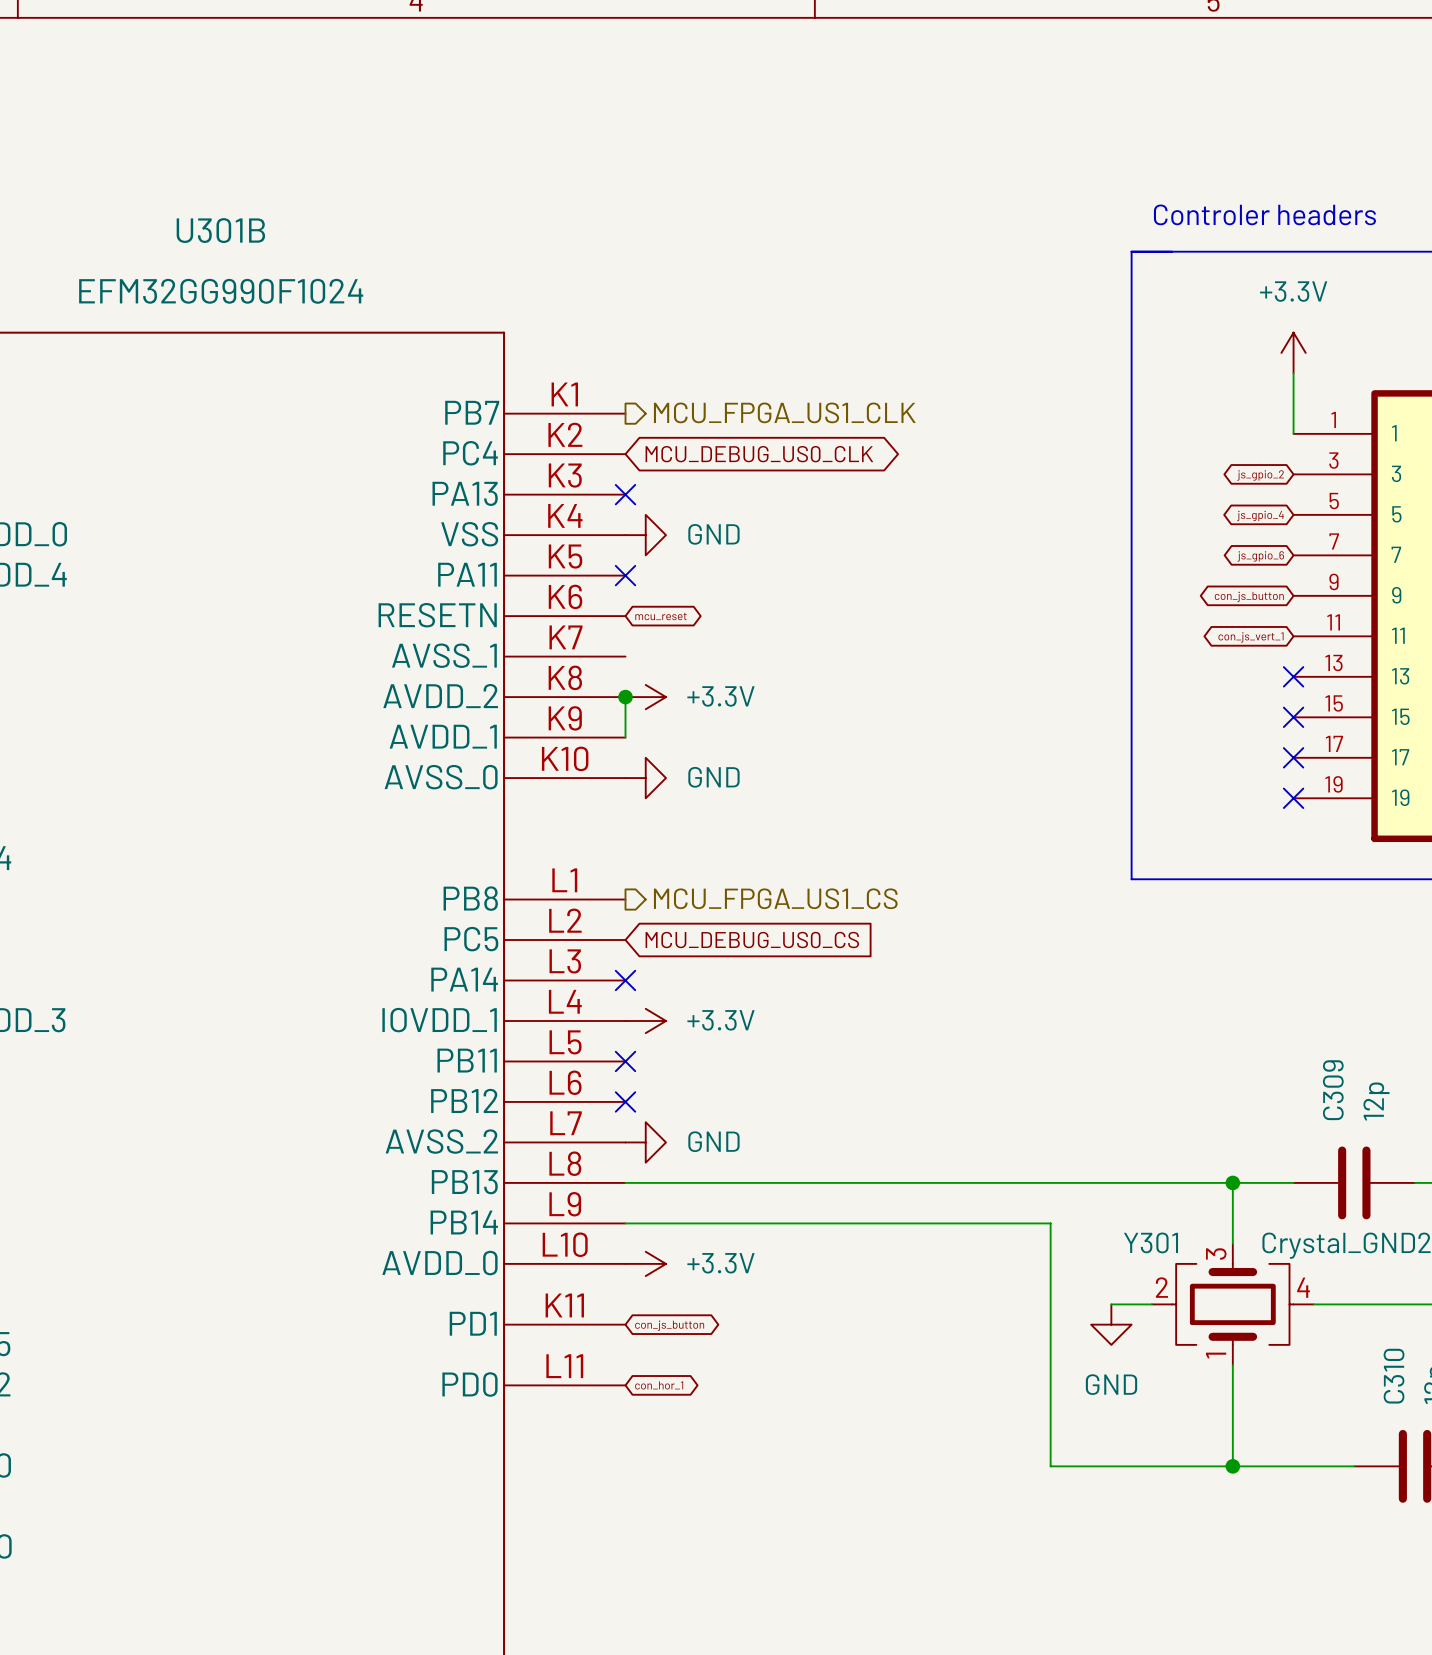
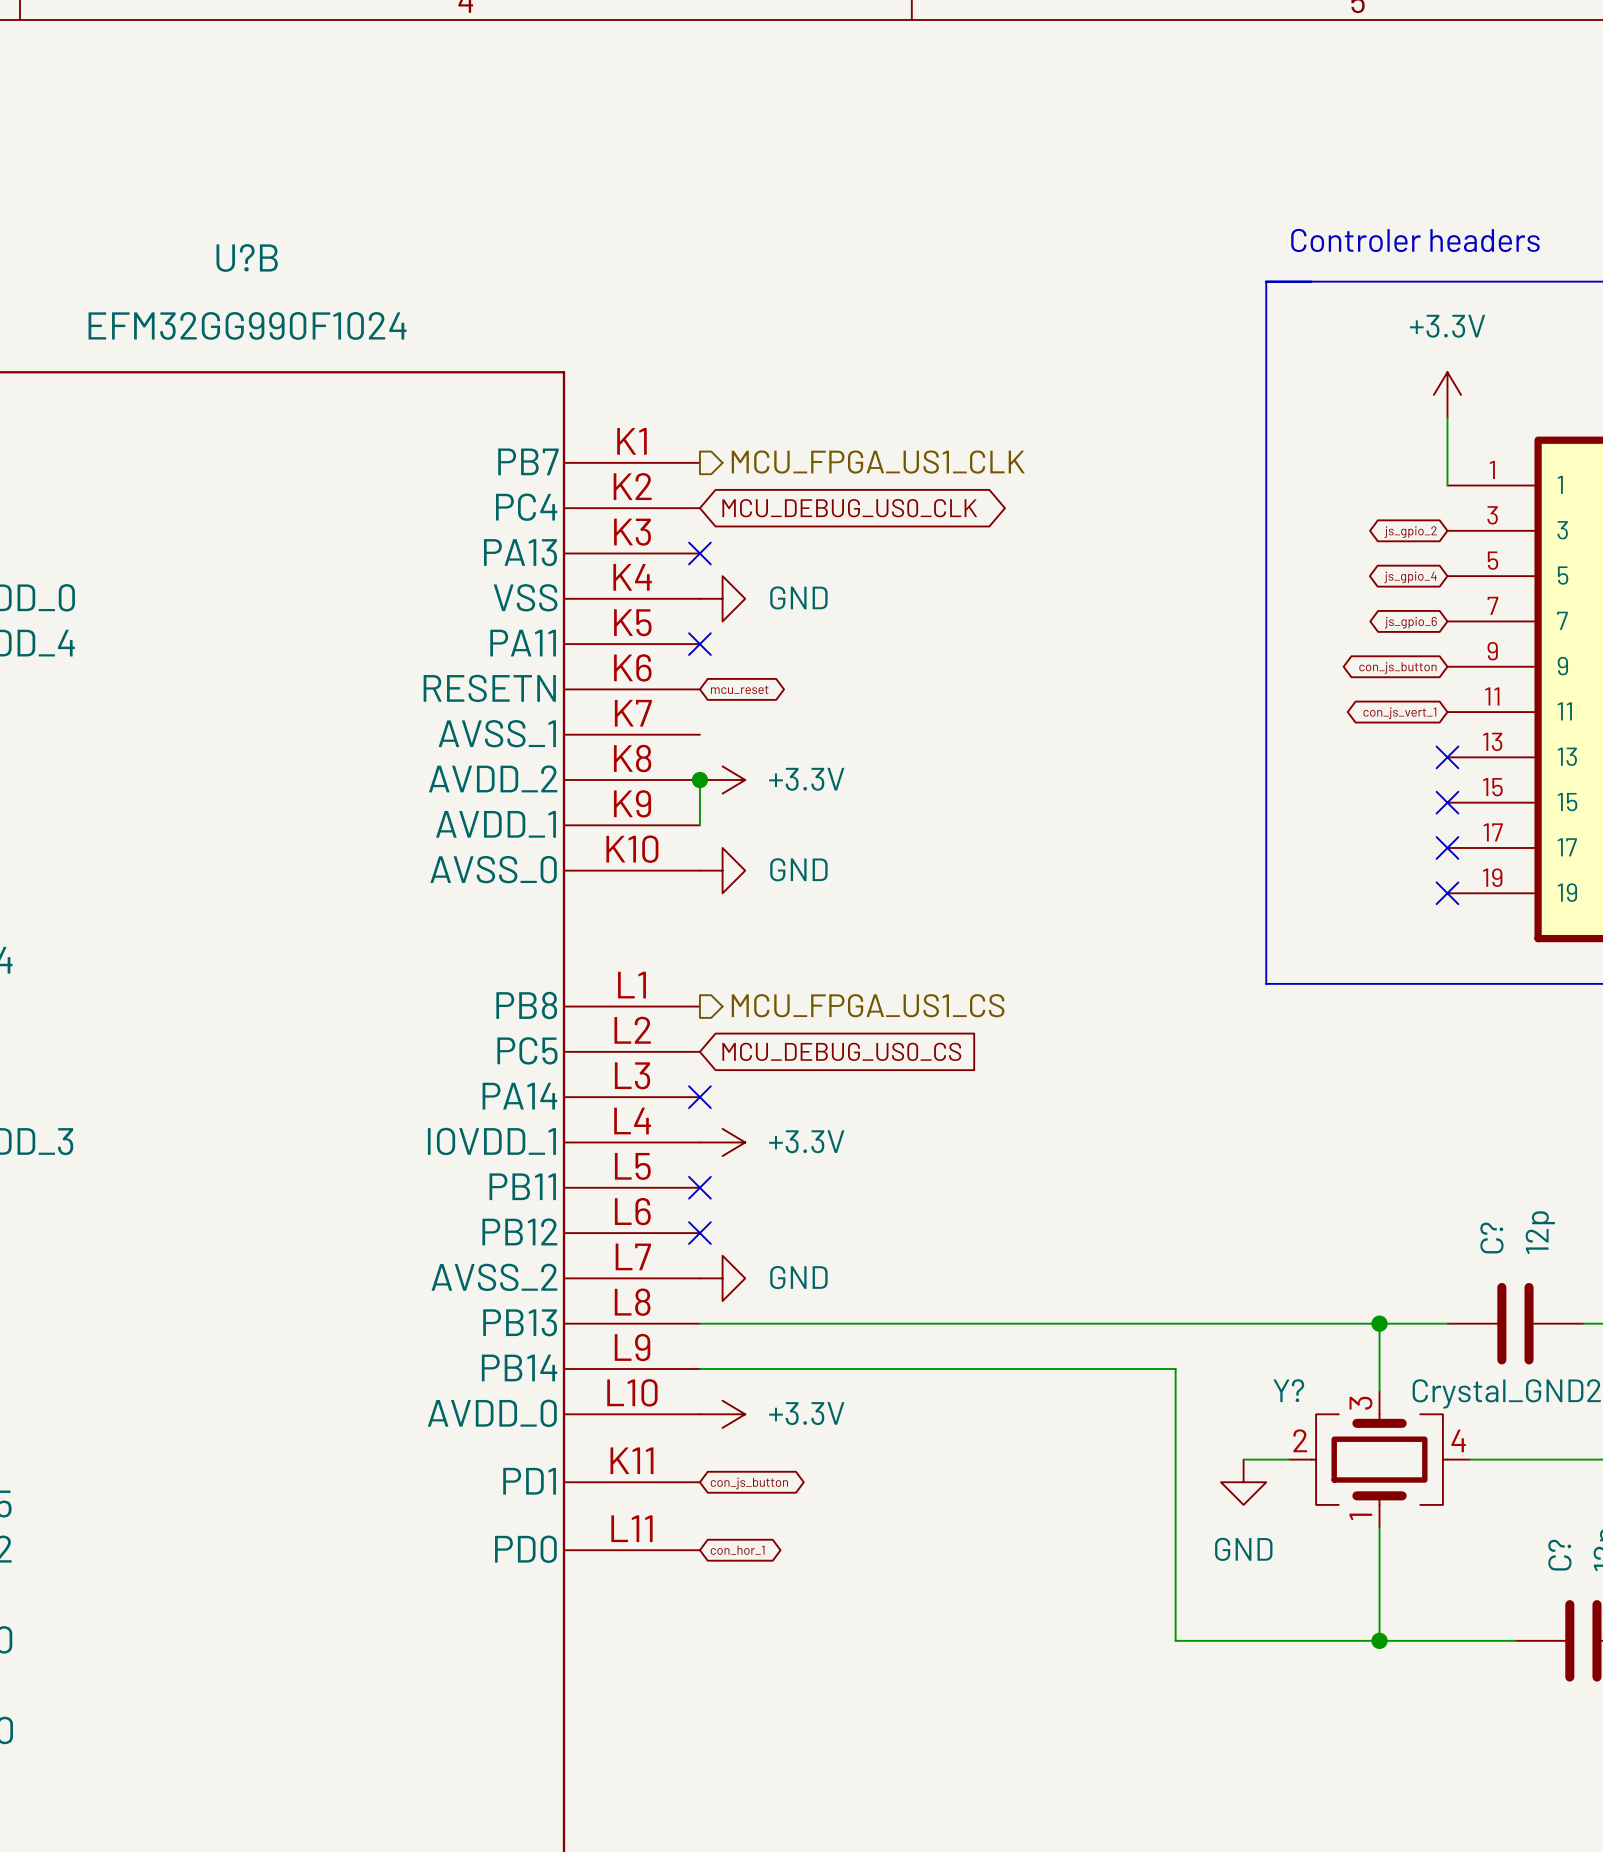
U301B name: U301B (220, 230) -> U?B (247, 257)
C309 name: C309 (1333, 1090) -> C? (1491, 1237)
Y301 name: Y301 (1151, 1242) -> Y? (1288, 1390)
C310 name: C310 (1394, 1376) -> C? (1559, 1555)

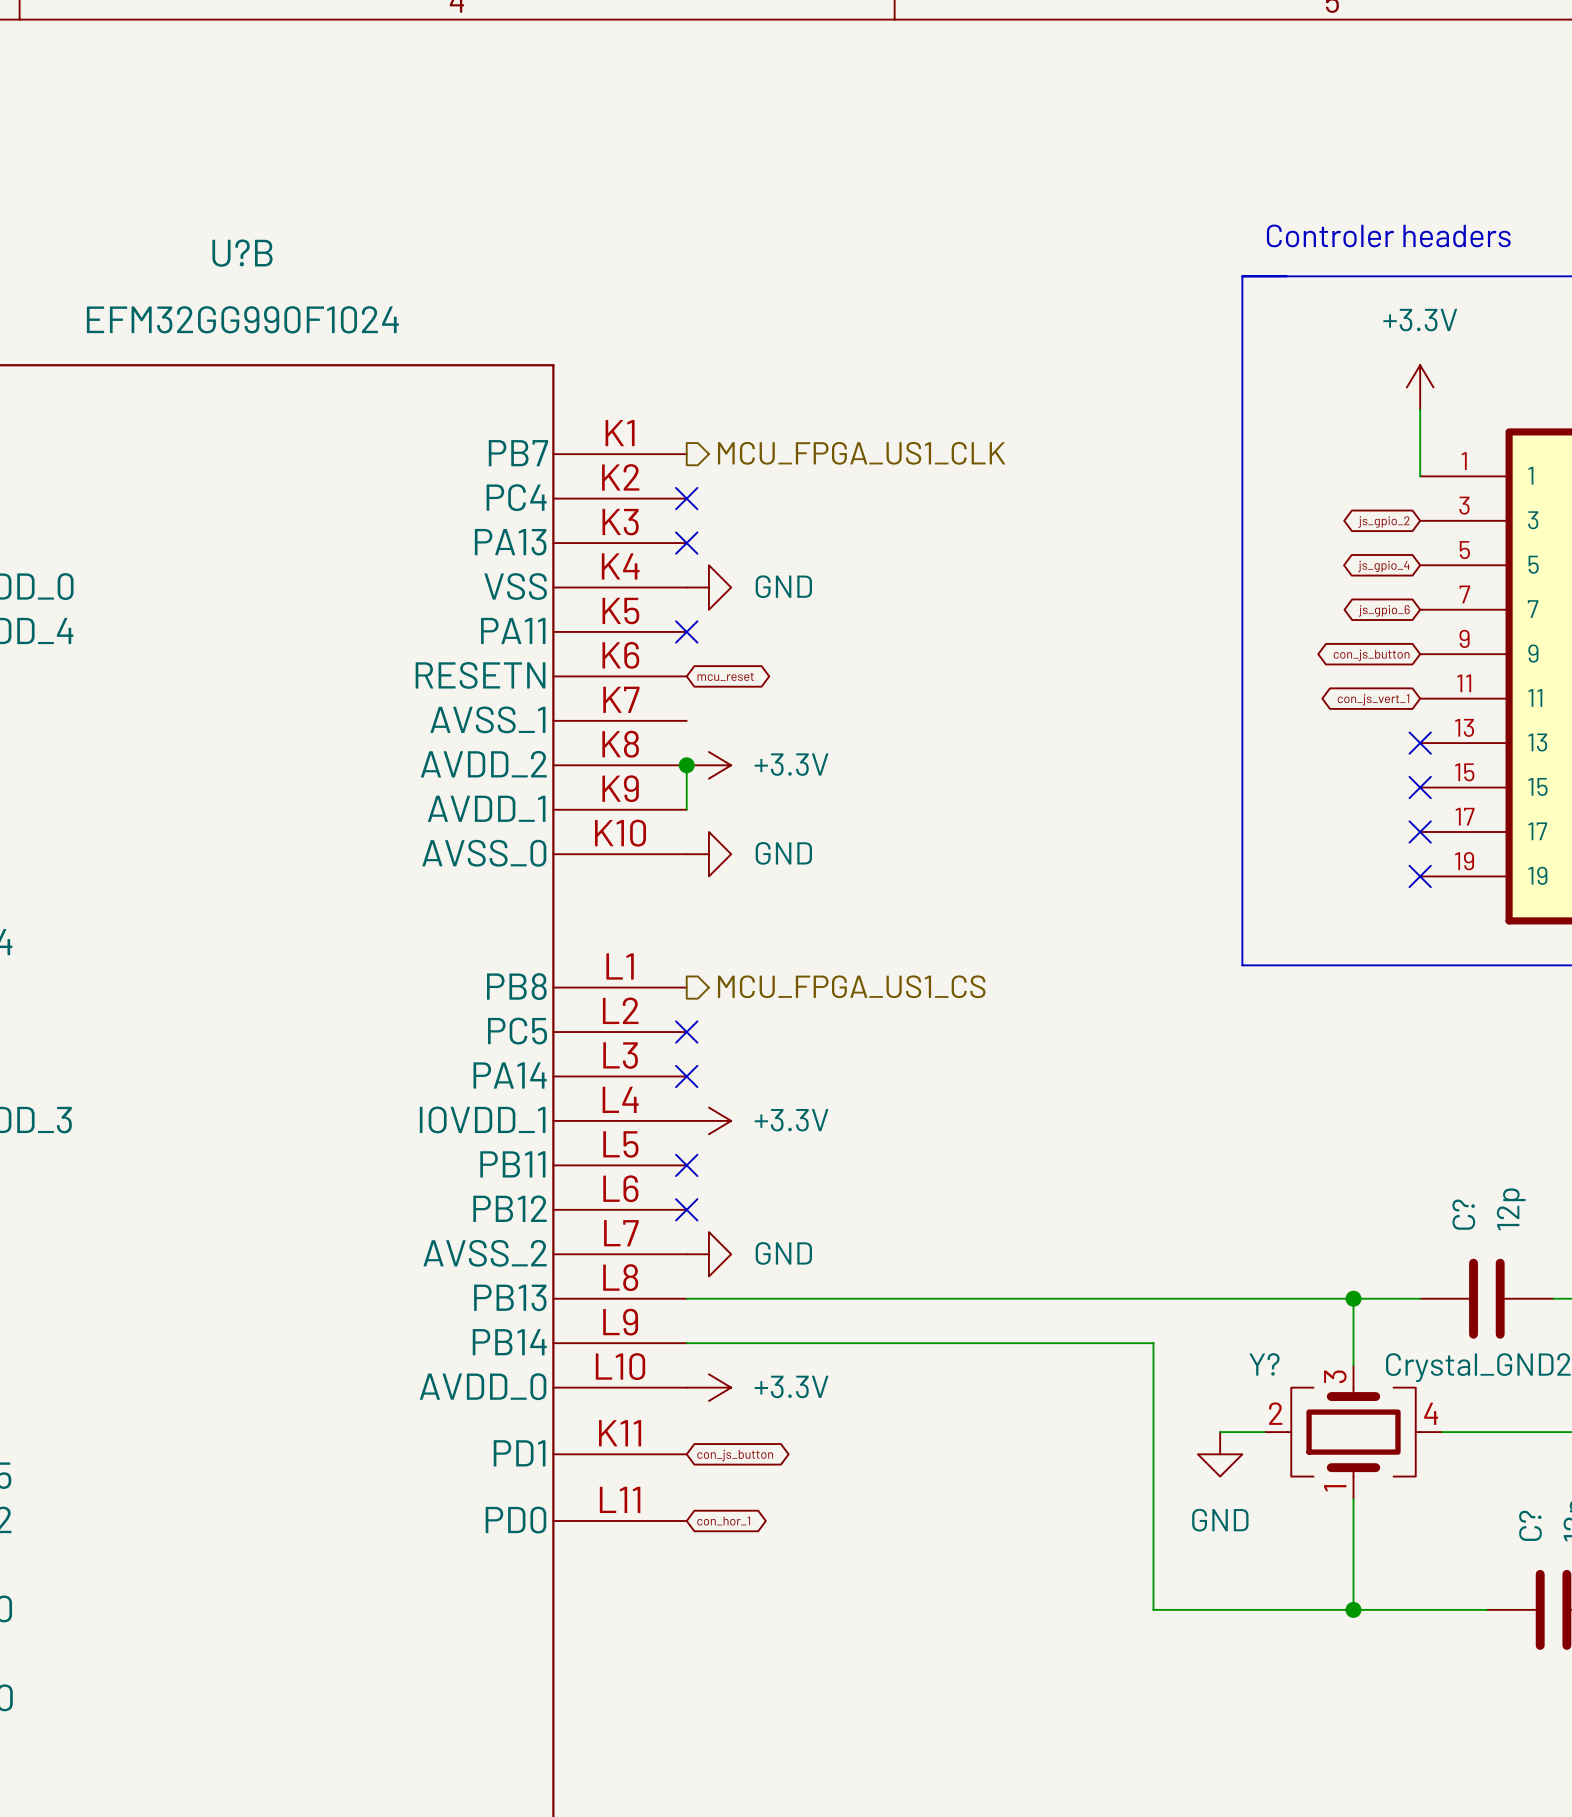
no-connect mark: none -> (686, 498)
global label: MCU_DEBUG_US0_CLK (849, 508) -> none
no-connect mark: none -> (686, 1032)
global label: MCU_DEBUG_US0_CS (841, 1051) -> none

